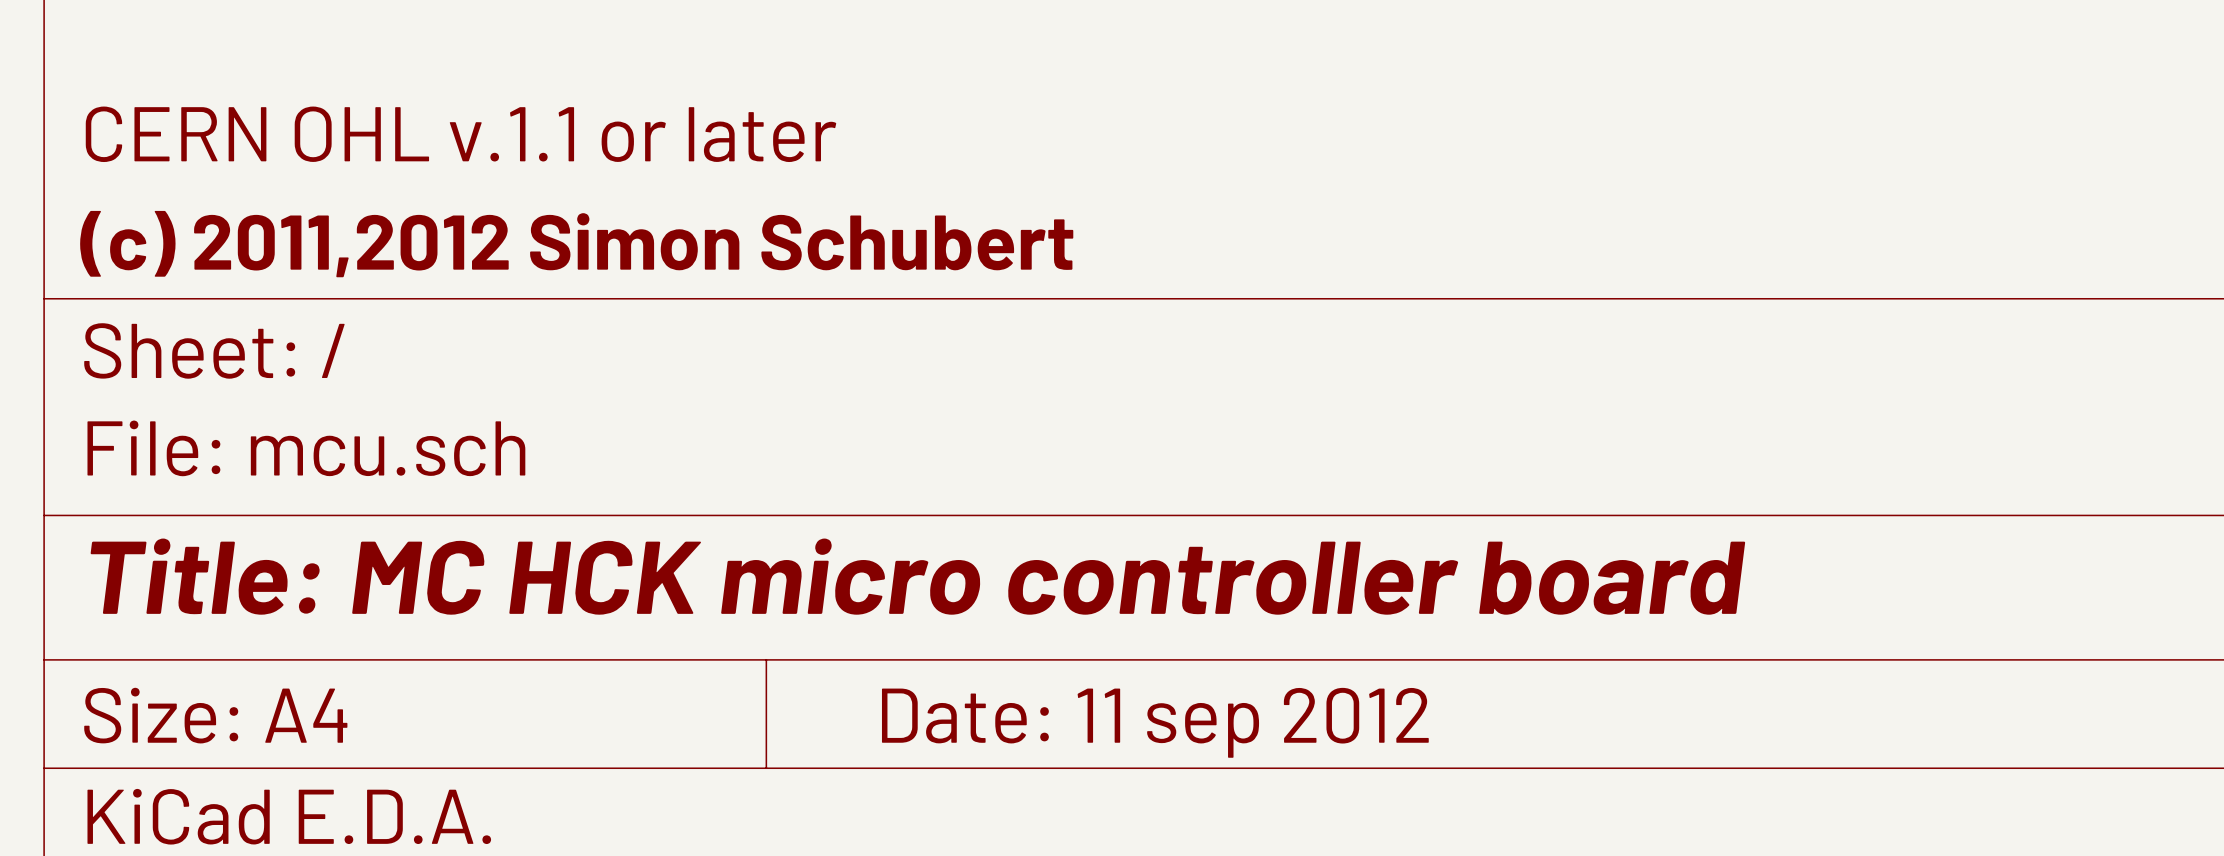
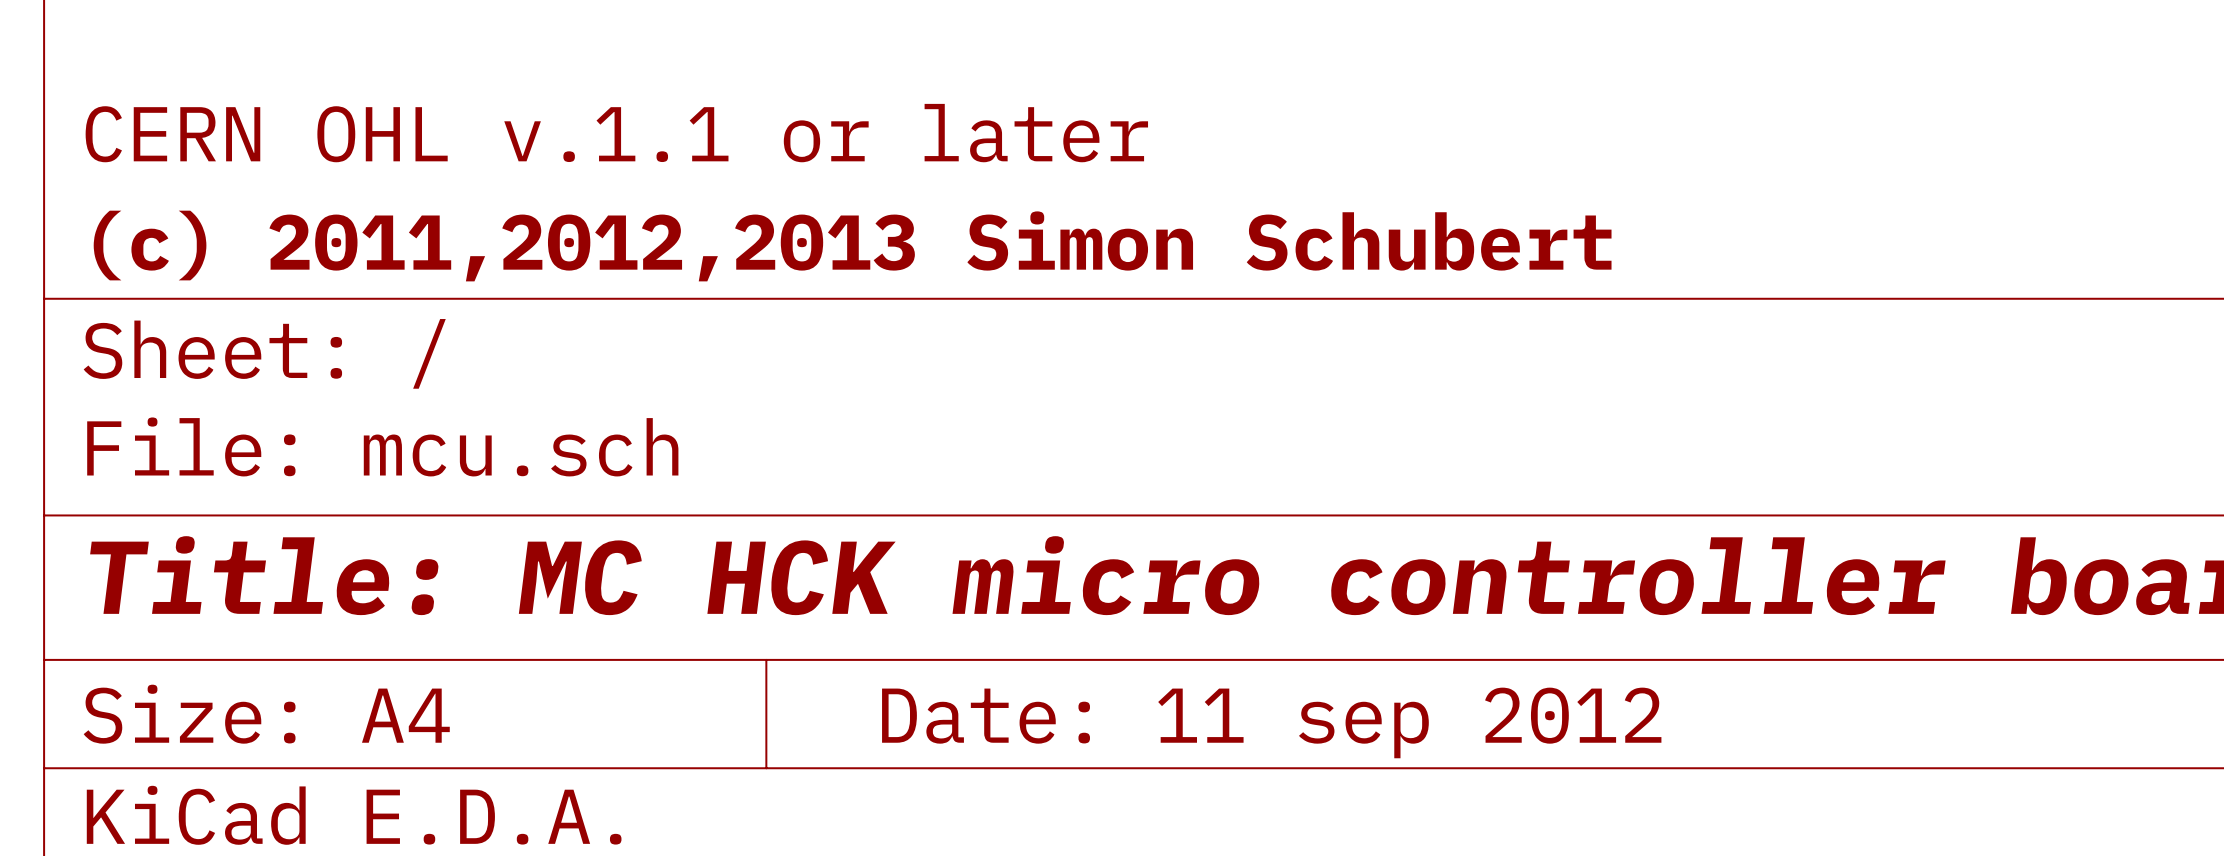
title block: (c) 2011,2012 Simon Schubert (576, 244) -> (c) 2011,2012,2013 Simon Schubert (852, 246)

